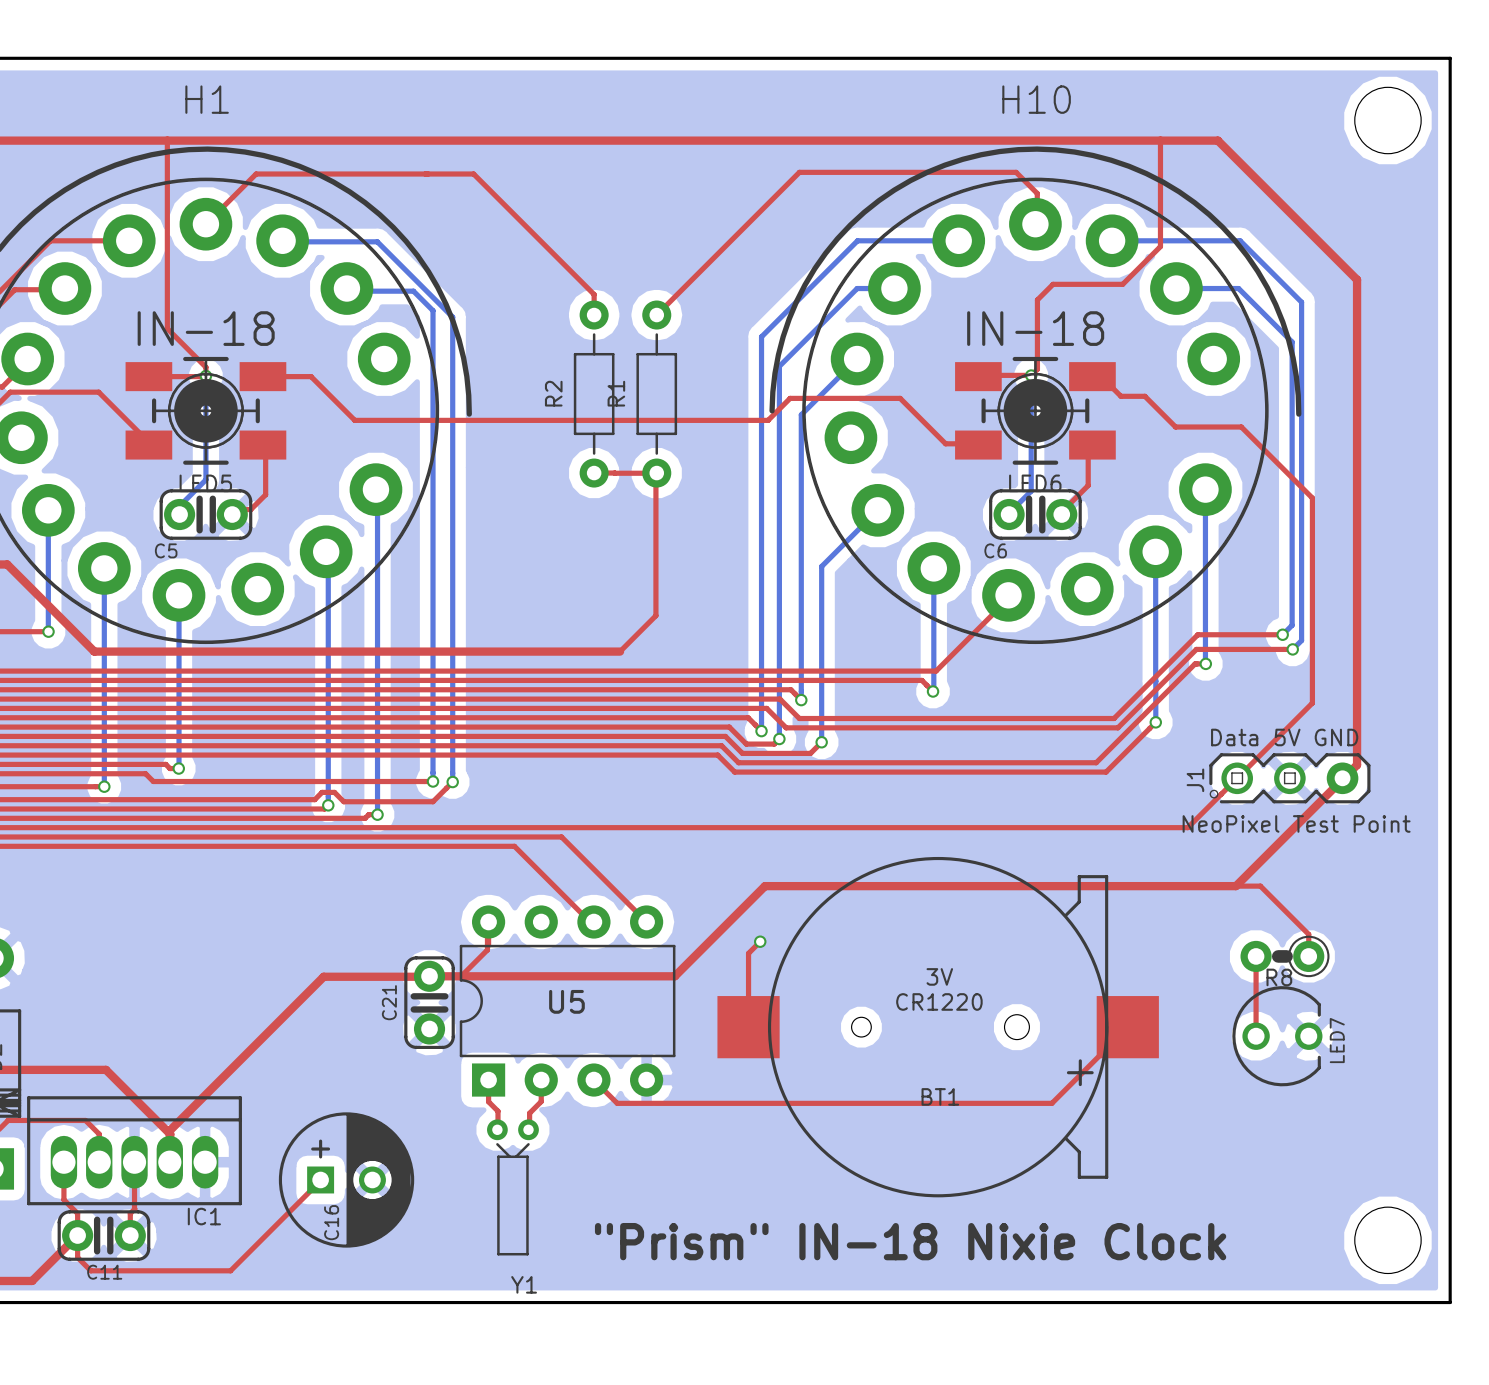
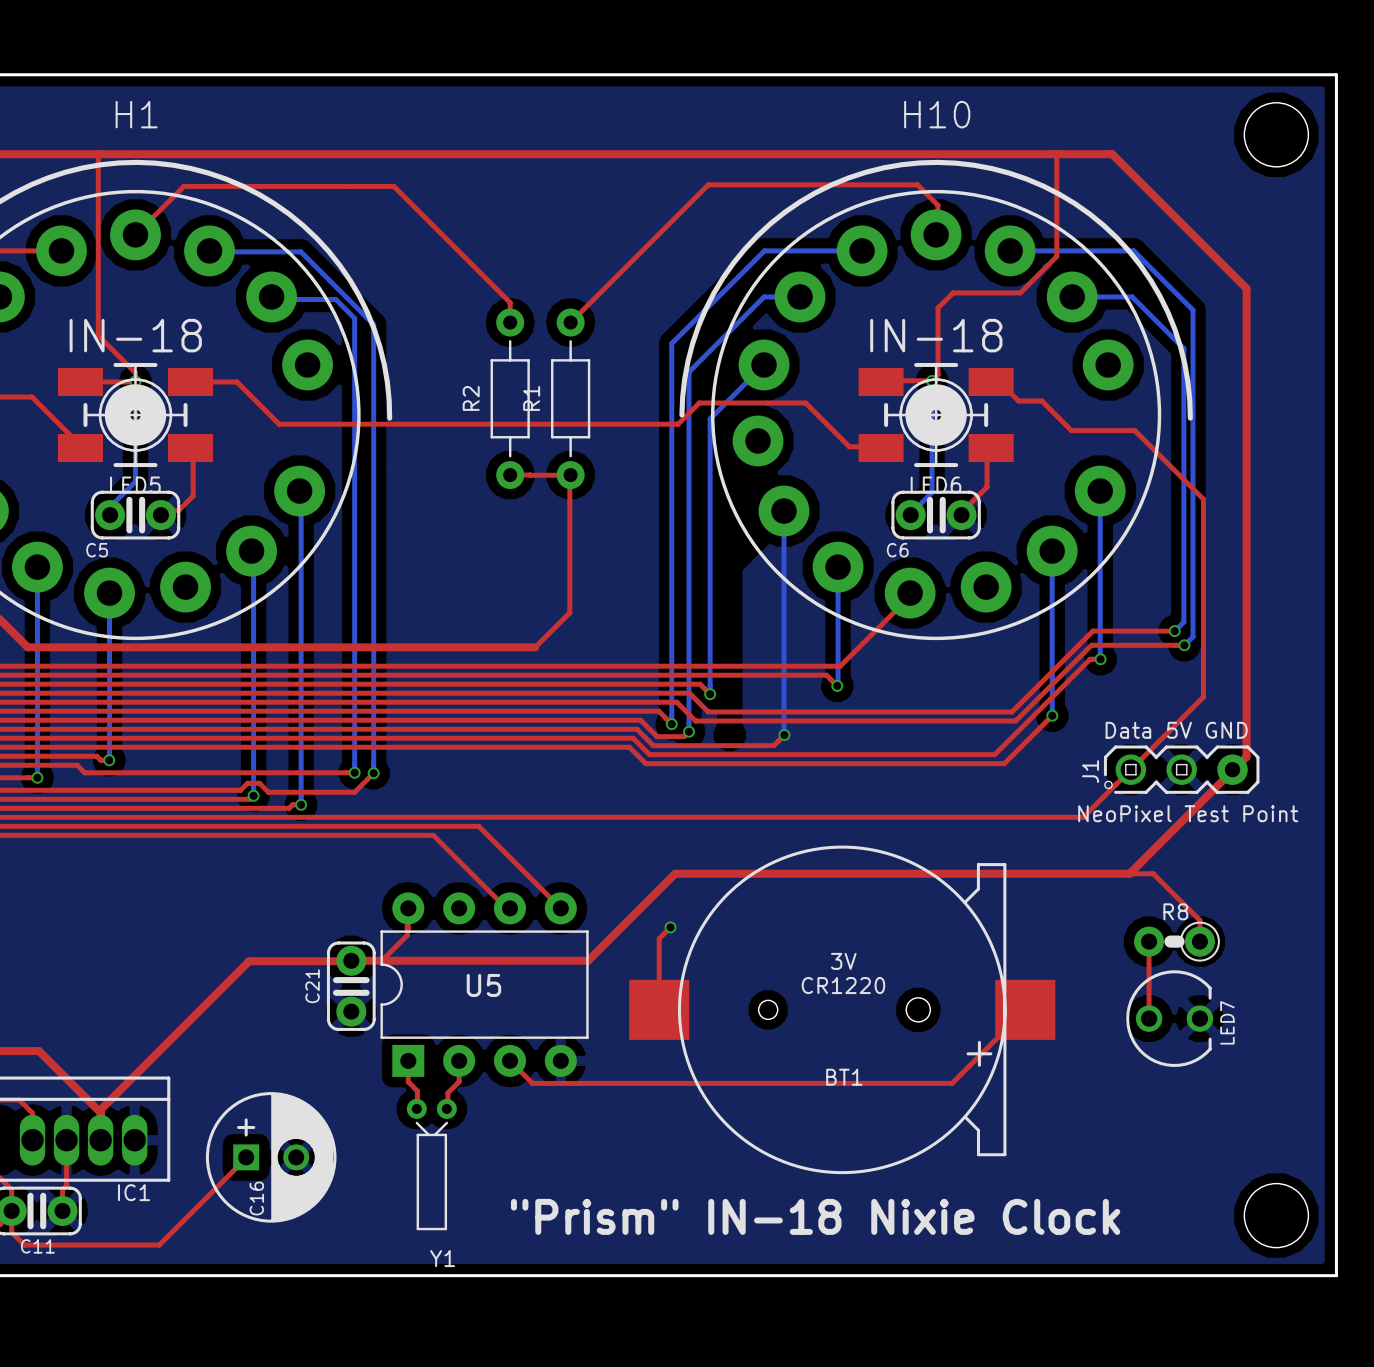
bottom track: (877, 510) (821, 566) (821, 742) -> (784, 511) (784, 735)
top track: (821, 742) (810, 753) -> (784, 735) (773, 745) (719, 745)
via position: (821, 742) -> (784, 735)
R8 name position: R8 (1279, 977) -> R8 (1175, 911)

